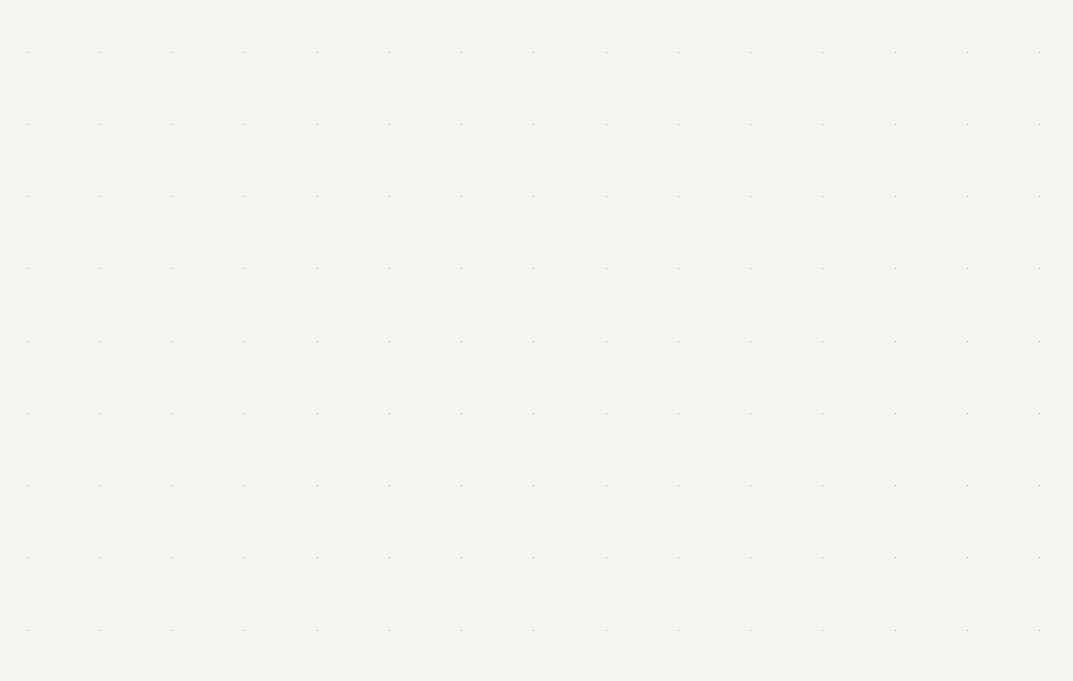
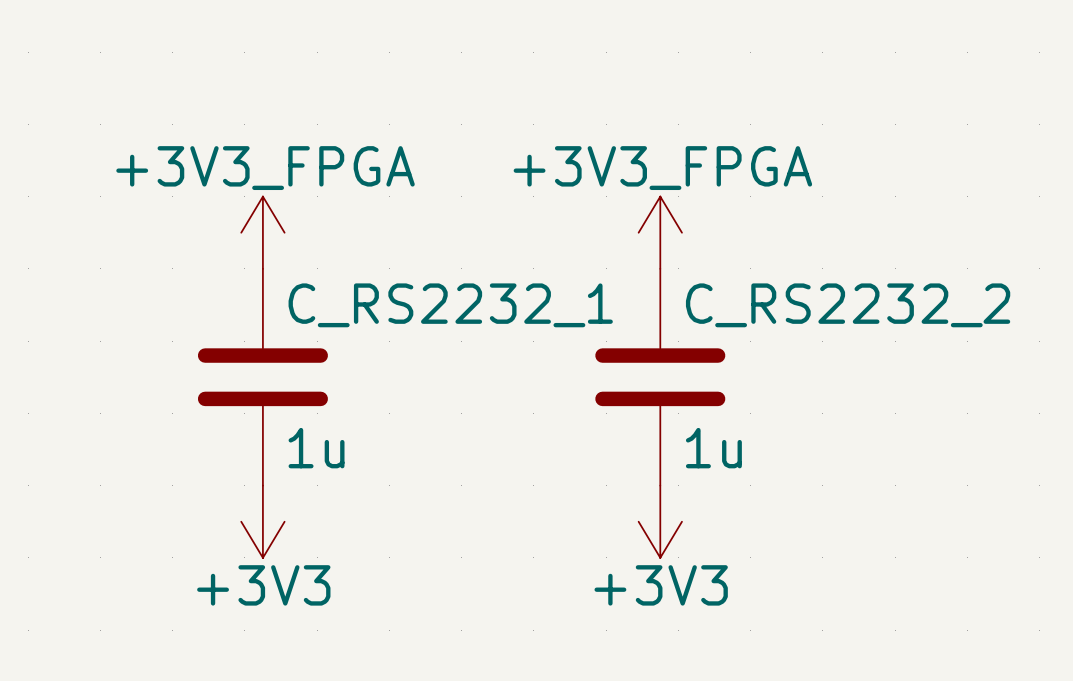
power symbol: none -> +3V3_FPGA (262, 232)
power symbol: none -> +3V3_FPGA (660, 232)
C_RS2232_1: none -> 1u (262, 377)
C_RS2232_2: none -> 1u (660, 377)
power symbol: none -> +3V3 (262, 521)
power symbol: none -> +3V3 (660, 521)

